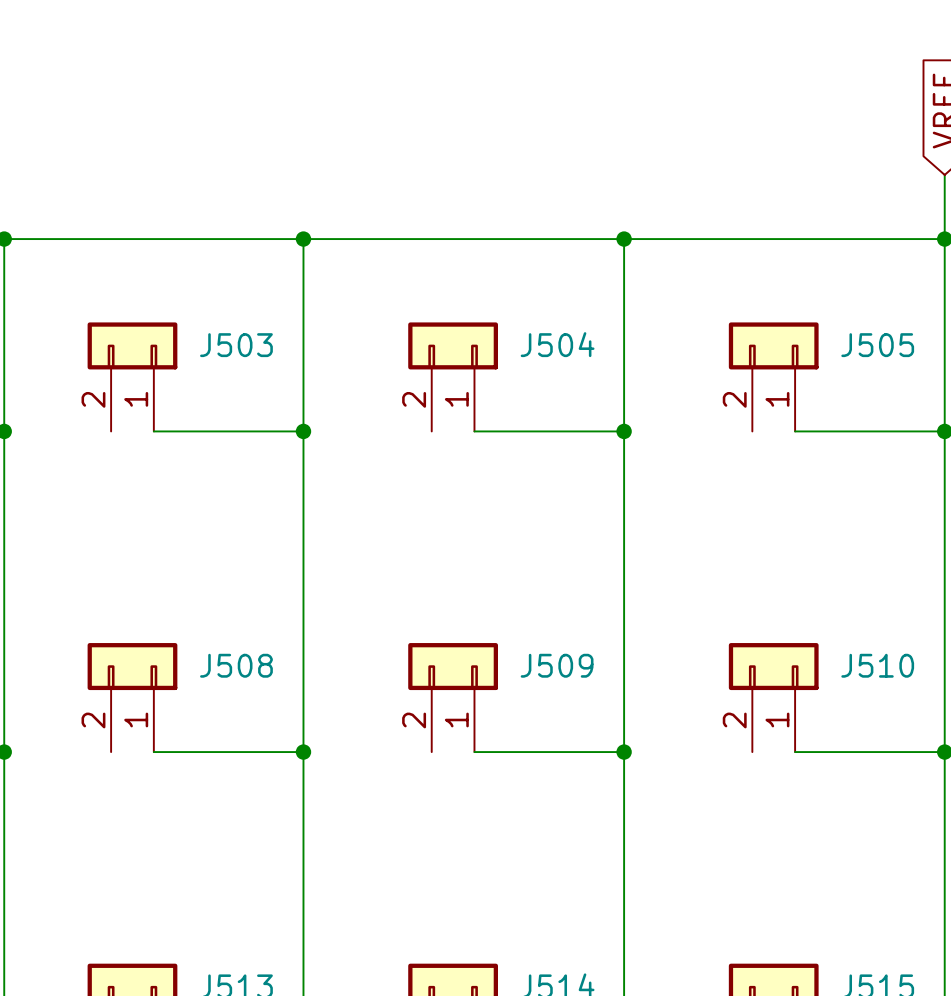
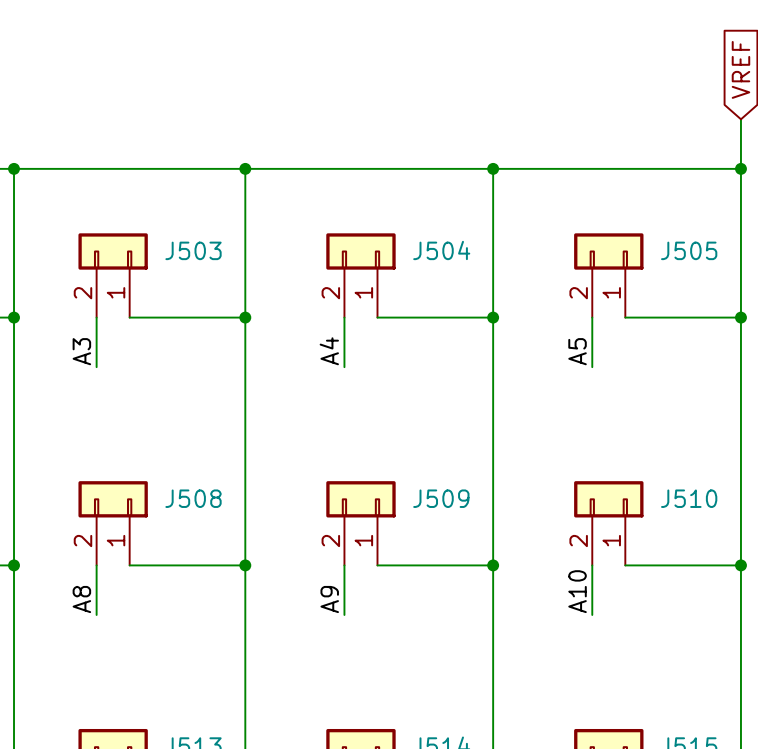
wire: none -> (96, 317) (96, 367)
wire: none -> (344, 317) (344, 367)
wire: none -> (592, 317) (592, 367)
label: none -> A3 (81, 351)
label: none -> A4 (329, 351)
label: none -> A5 (577, 351)
wire: none -> (96, 565) (96, 614)
wire: none -> (344, 565) (344, 614)
wire: none -> (592, 565) (592, 614)
label: none -> A10 (577, 591)
label: none -> A8 (81, 599)
label: none -> A9 (329, 599)

